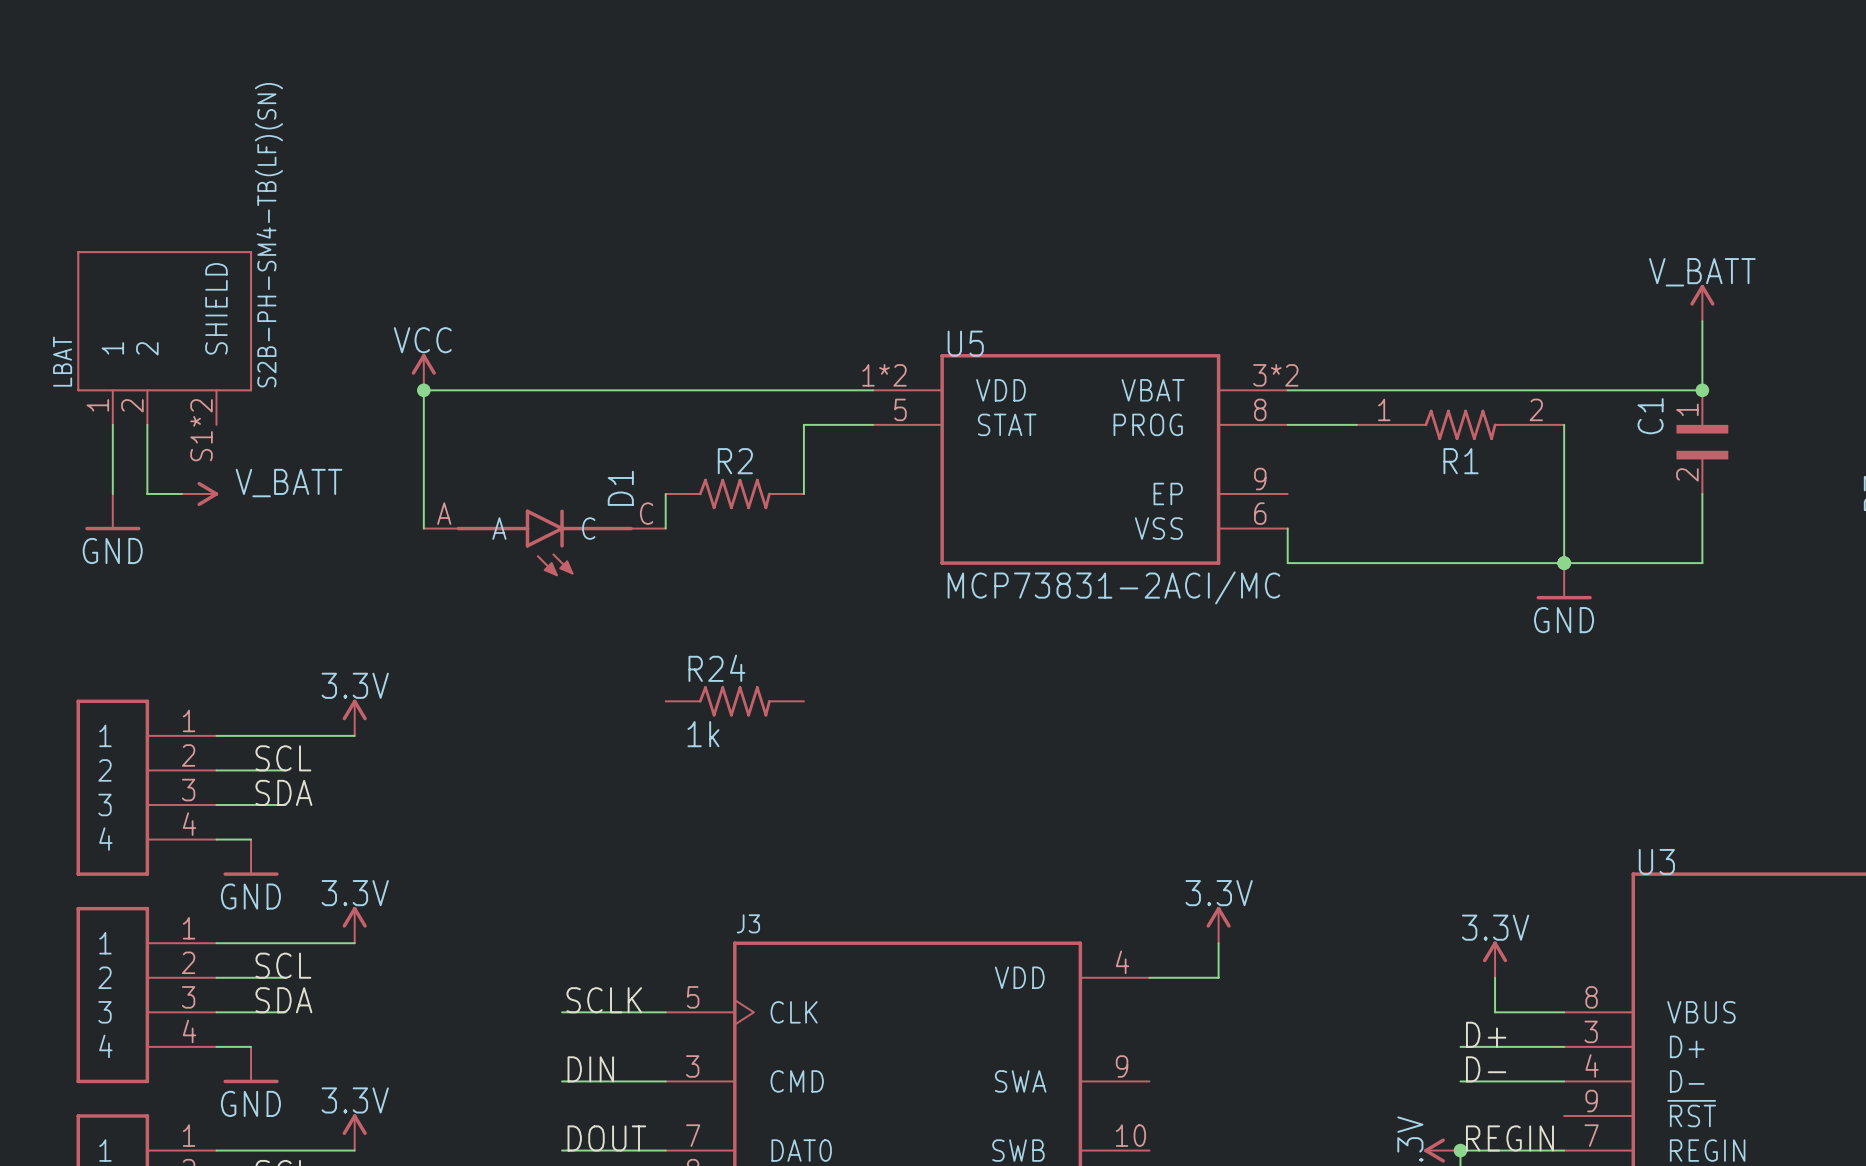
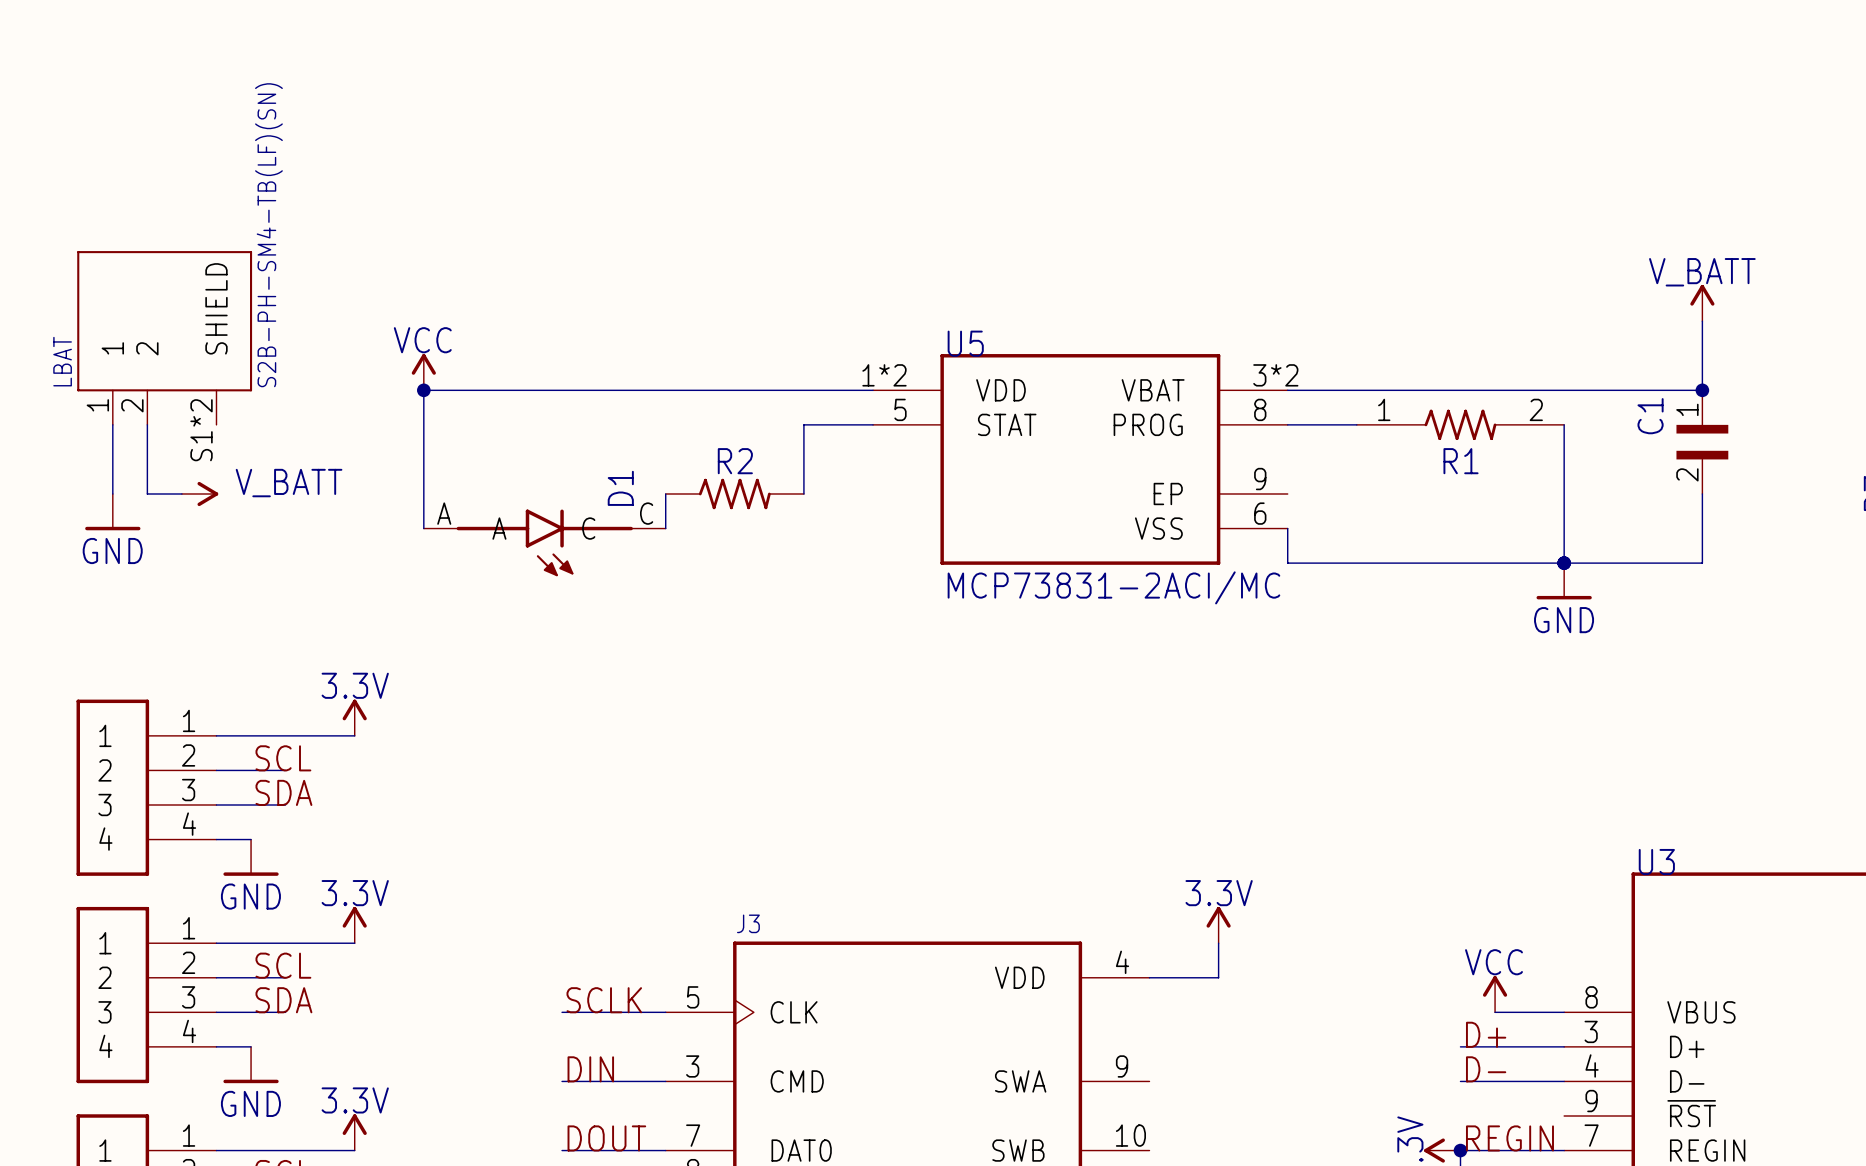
R24: 1k (734, 701) -> none
power symbol: 3.3V (1495, 959) -> none
power symbol: none -> VCC (1495, 994)

